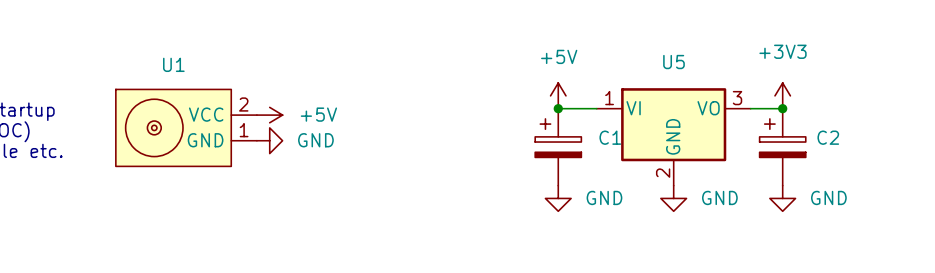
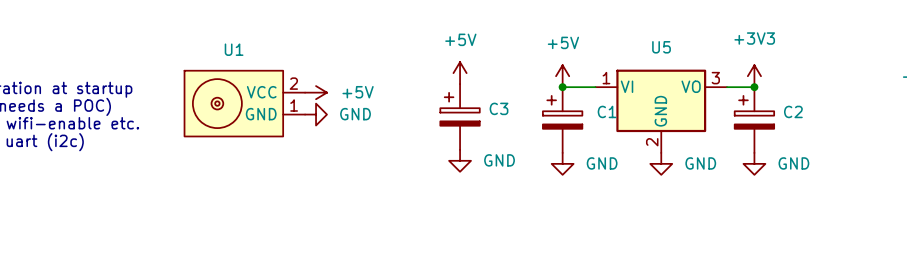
power symbol: none -> +5V (460, 73)
C3: none -> (460, 116)
power symbol: none -> GND (460, 160)

